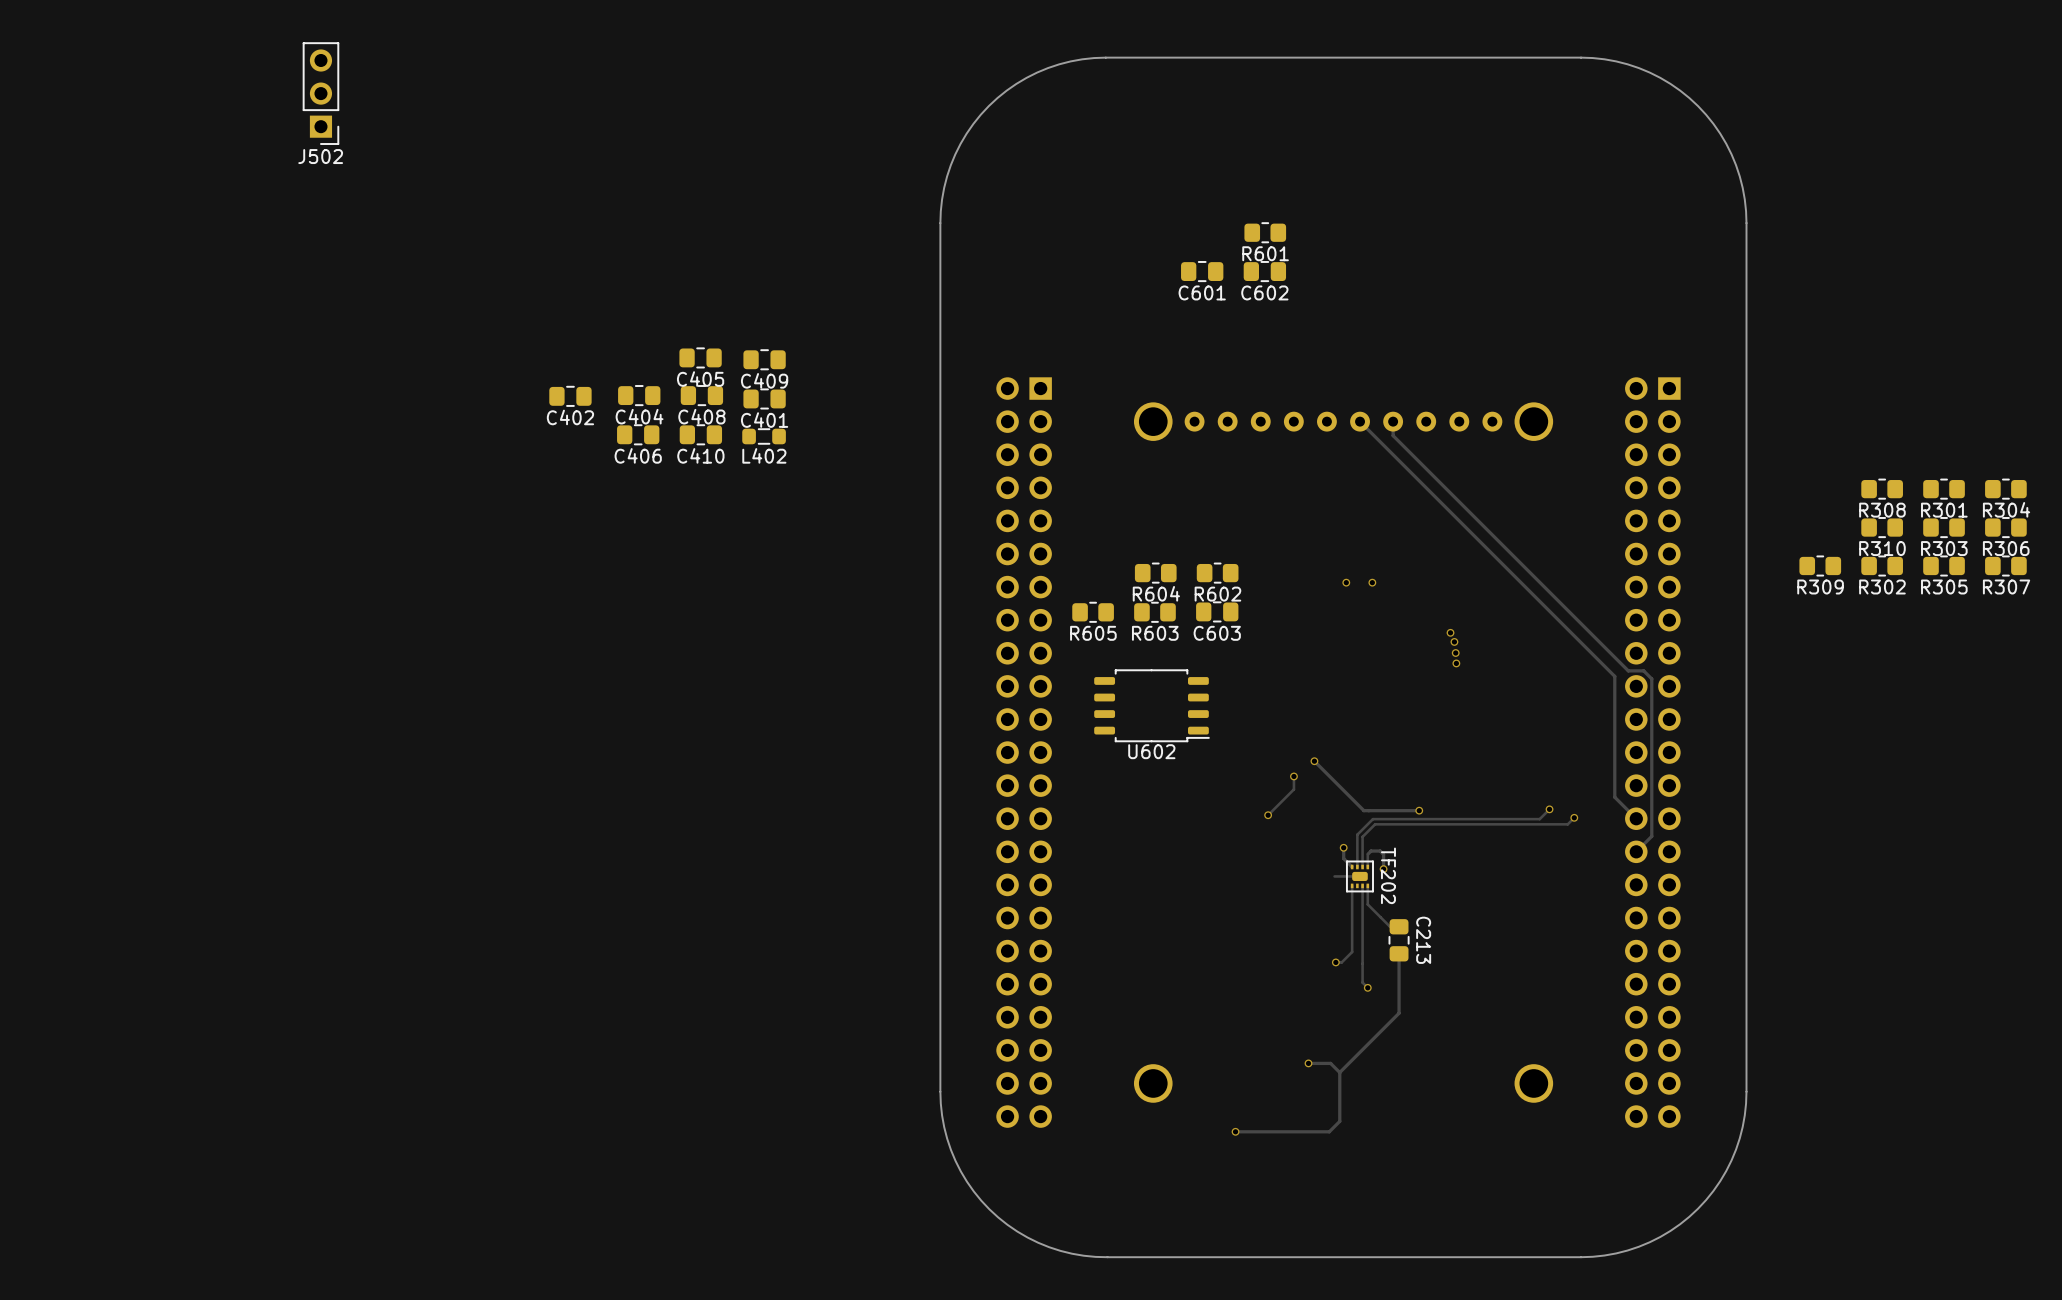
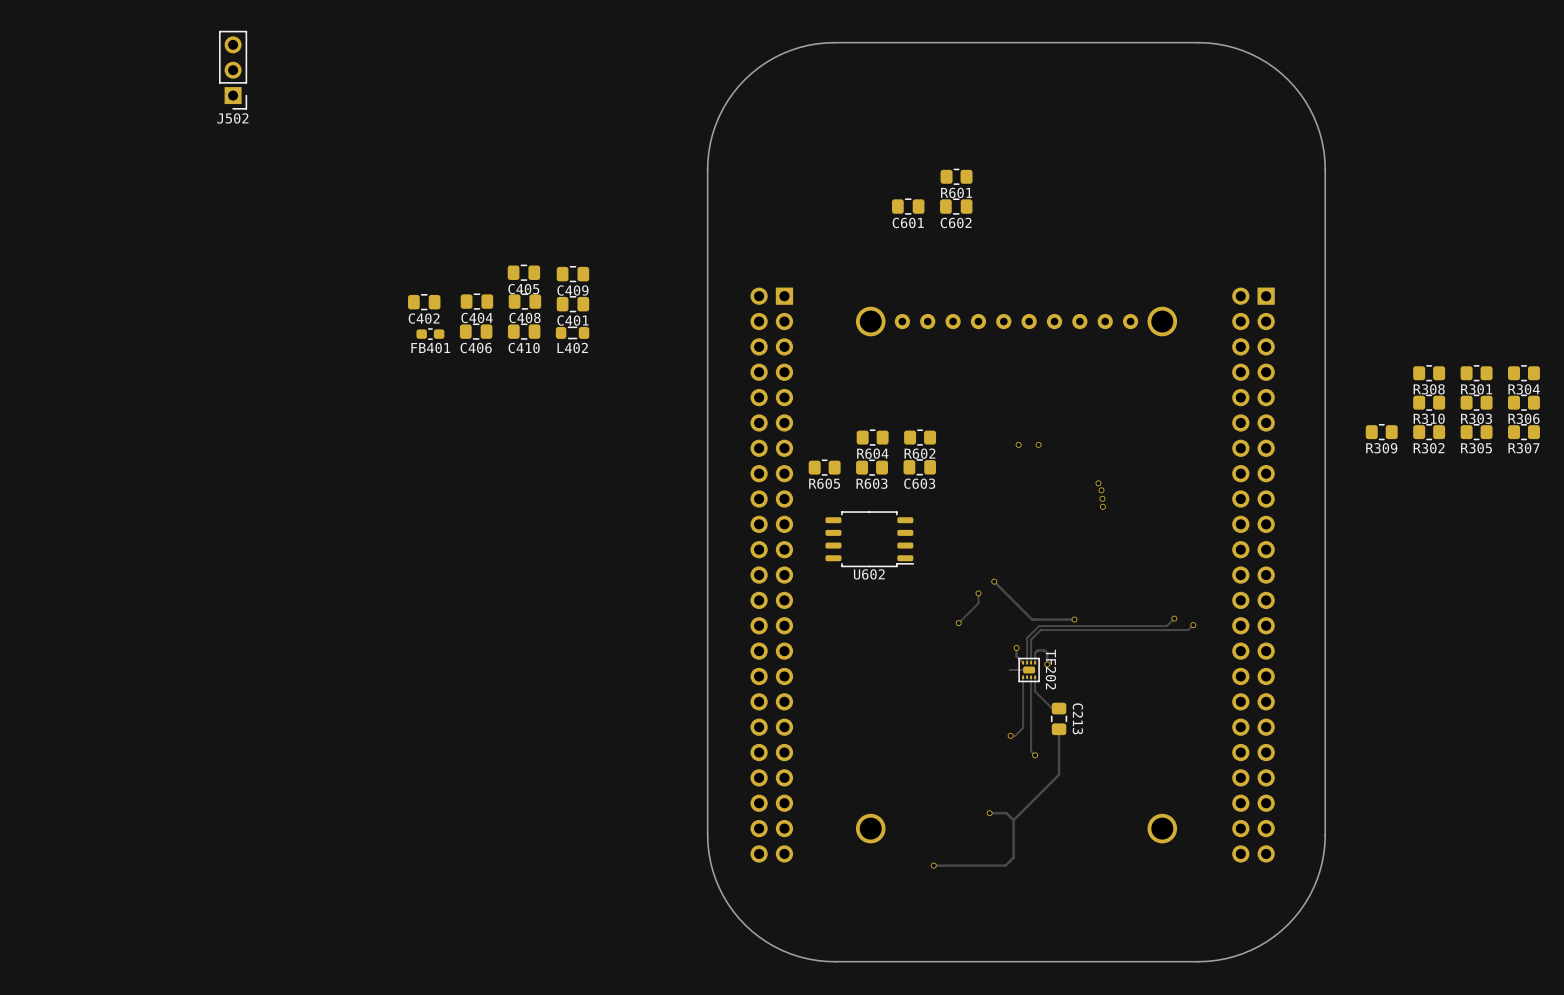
track: (1360, 421) (1614, 676) (1614, 797) (1636, 818) -> none
track: (1393, 421) (1393, 435) (1628, 670) (1643, 670) (1651, 678) (1651, 836) (1636, 851) -> none
FB401: none -> (430, 334)

